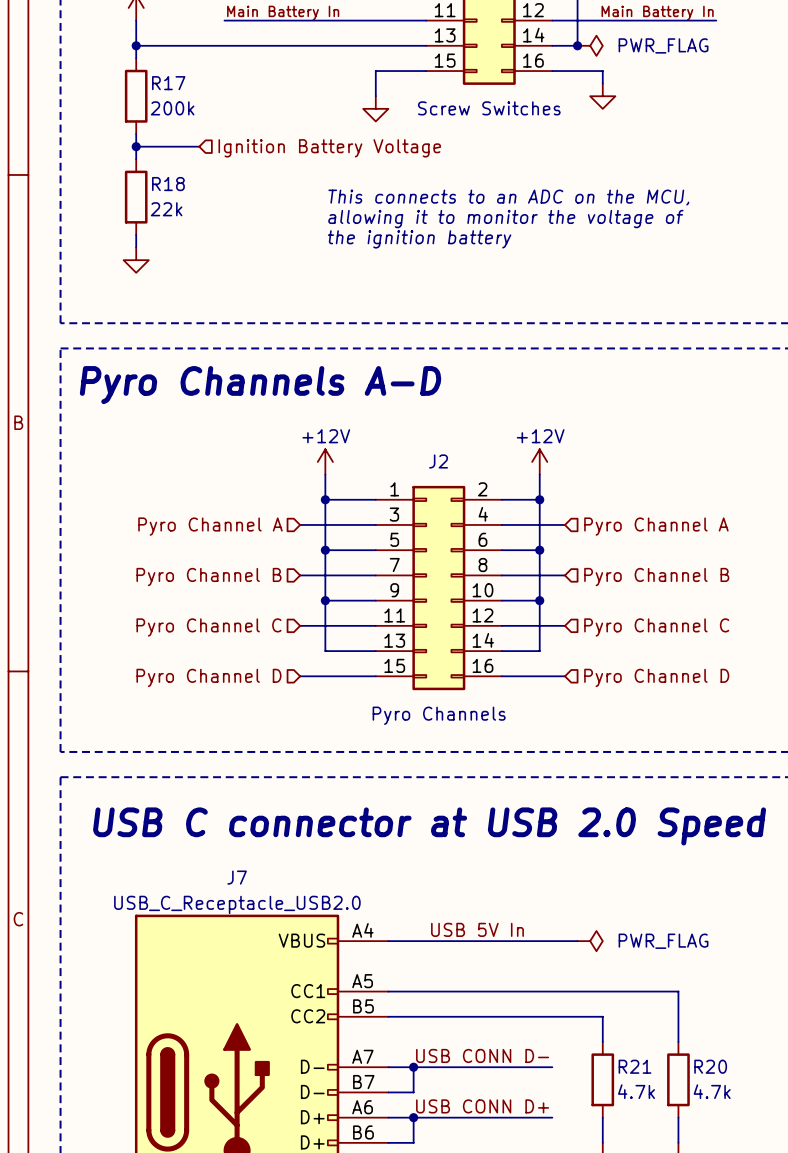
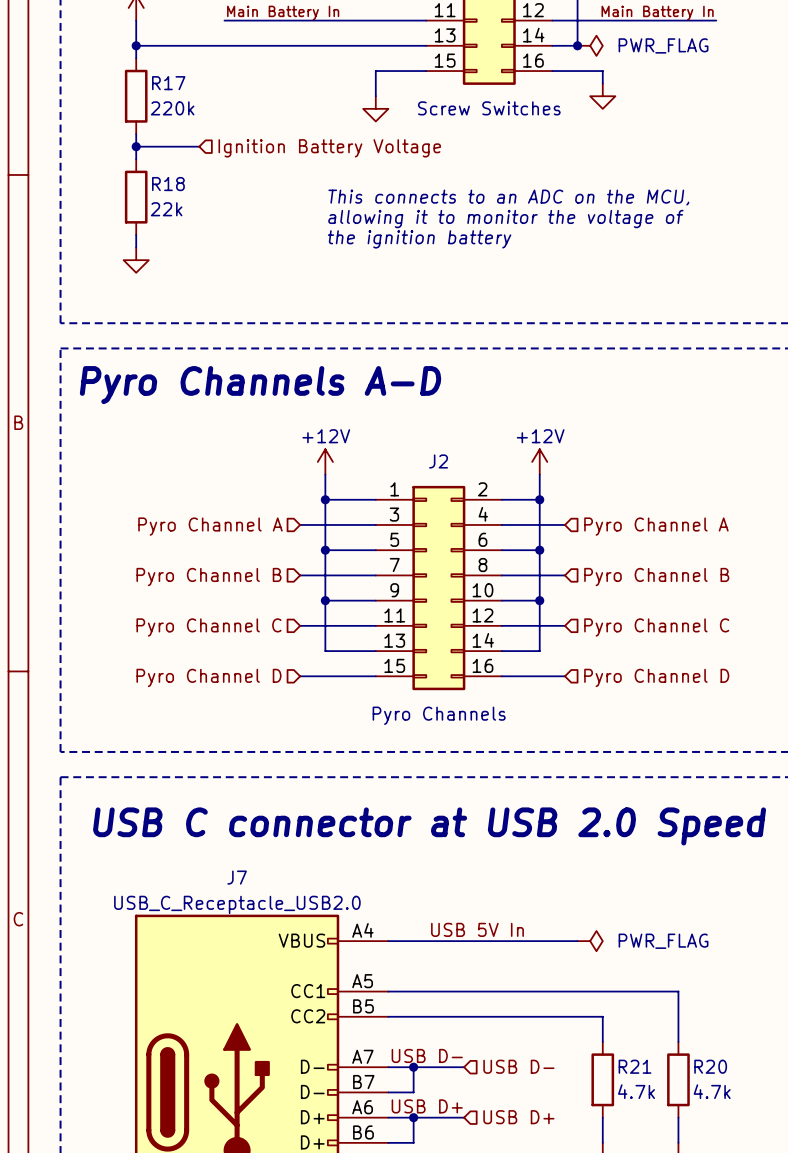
R17 value: 200k (172, 108) -> 220k (172, 108)
label: USB CONN D- (482, 1055) -> USB D- (427, 1055)
hierarchical label: none -> USB D- (518, 1066)
wire: (464, 1067) (552, 1067) -> none
label: USB CONN D+ (482, 1106) -> USB D+ (427, 1106)
wire: (464, 1117) (552, 1117) -> none
hierarchical label: none -> USB D+ (518, 1117)

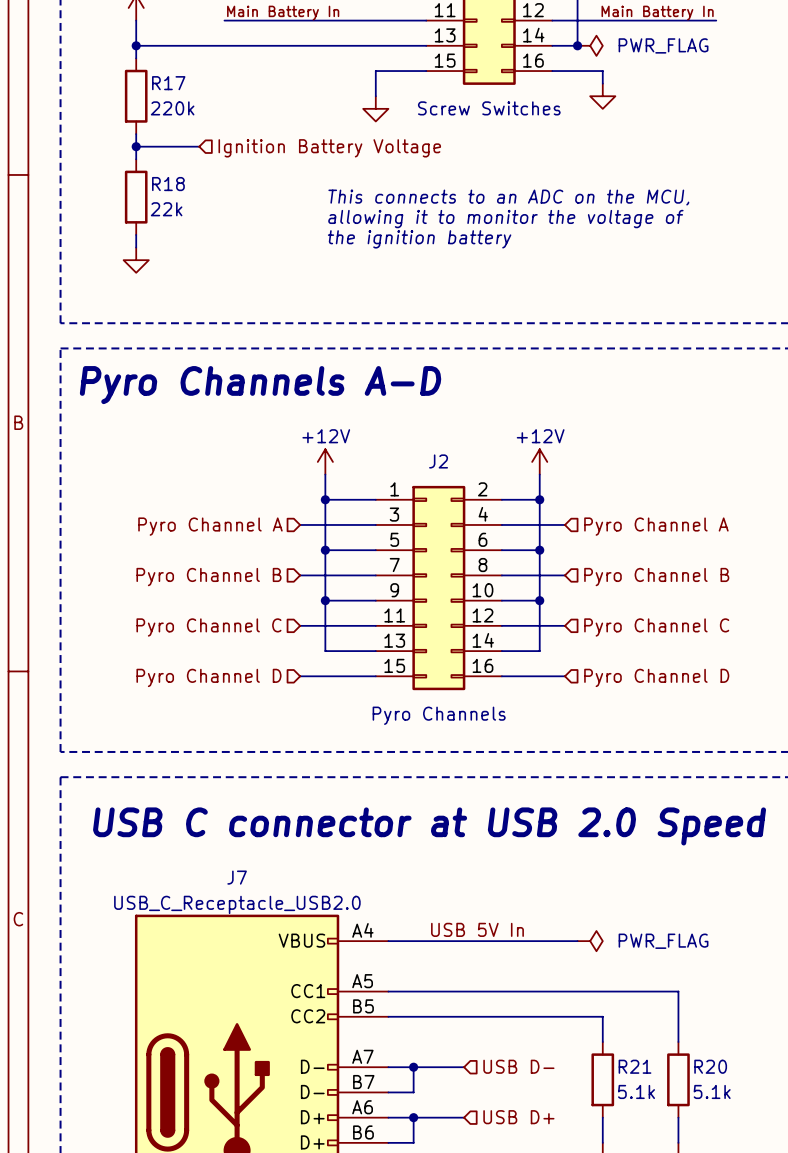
label: USB D- (427, 1055) -> none
R21 value: 4.7k (636, 1091) -> 5.1k (636, 1091)
R20 value: 4.7k (712, 1091) -> 5.1k (712, 1091)
label: USB D+ (427, 1106) -> none

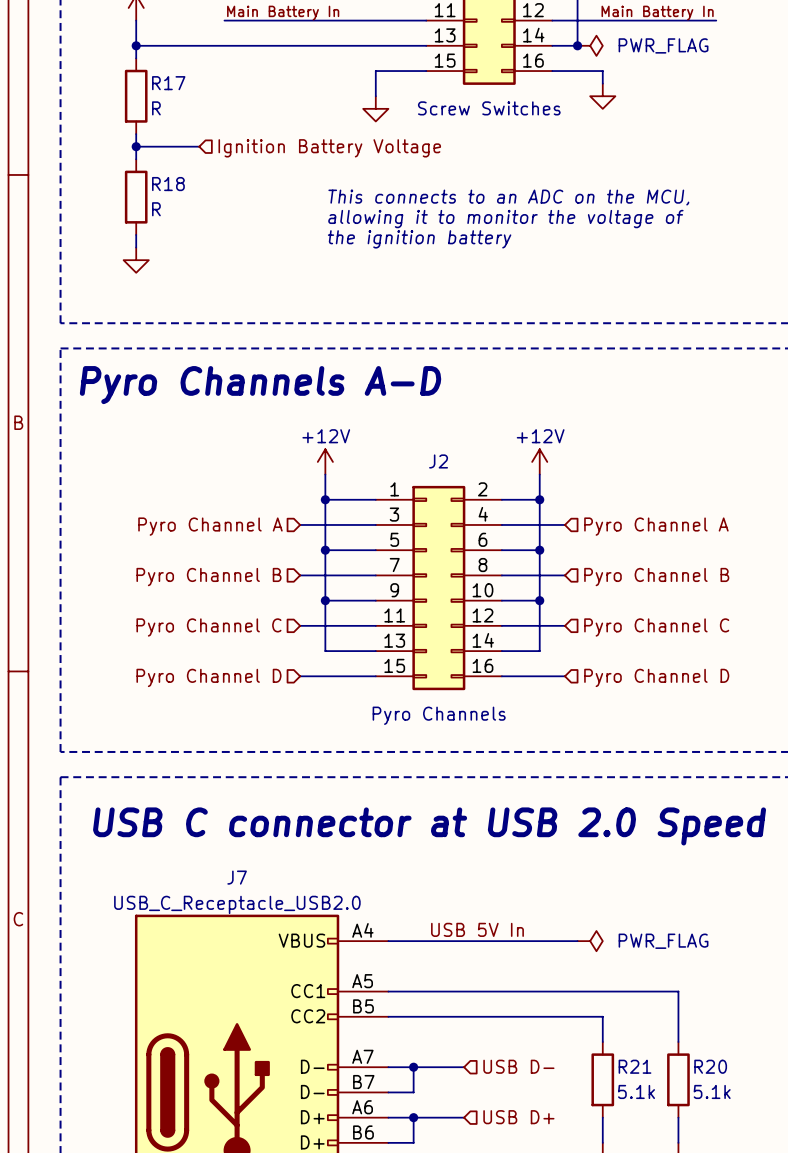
R17 value: 220k (172, 108) -> R (156, 108)
R18 value: 22k (166, 209) -> R (156, 209)

